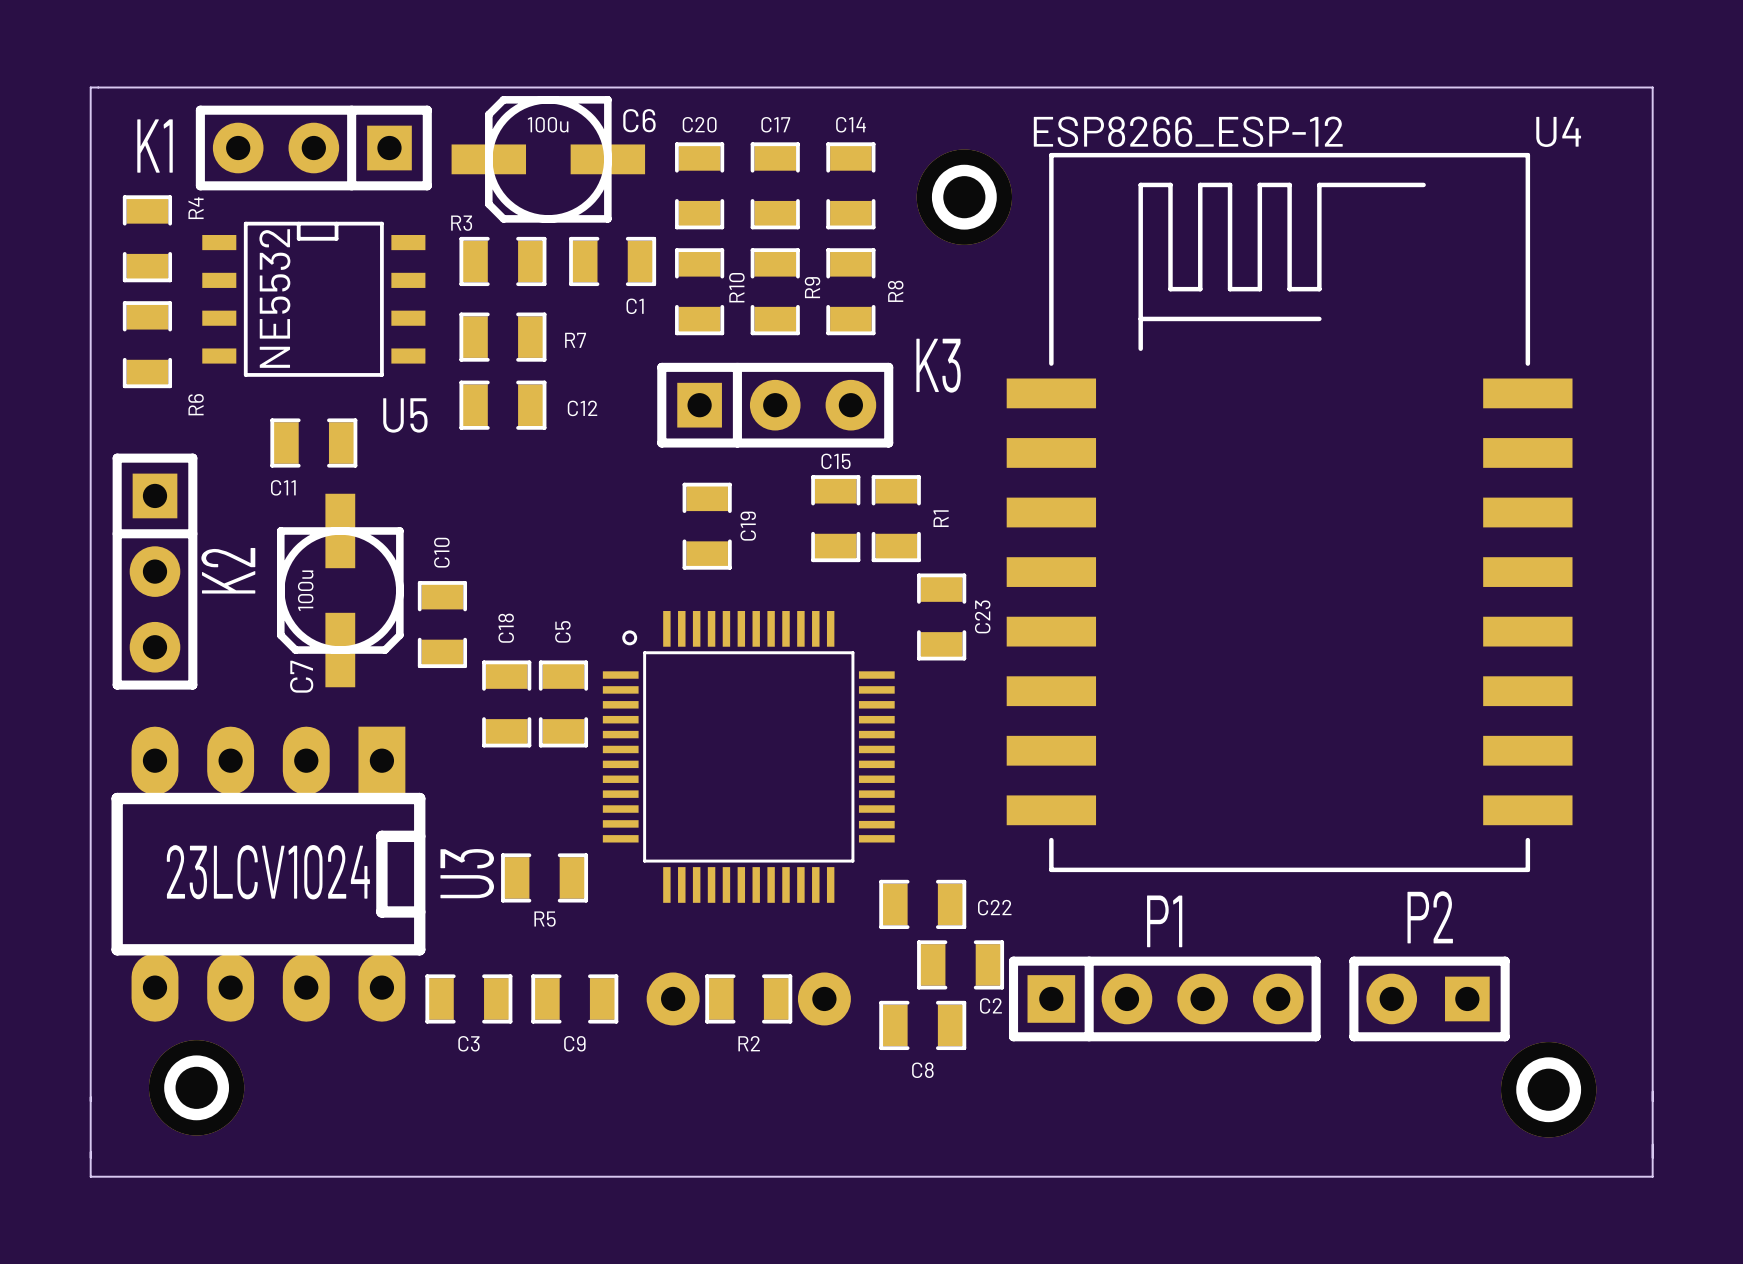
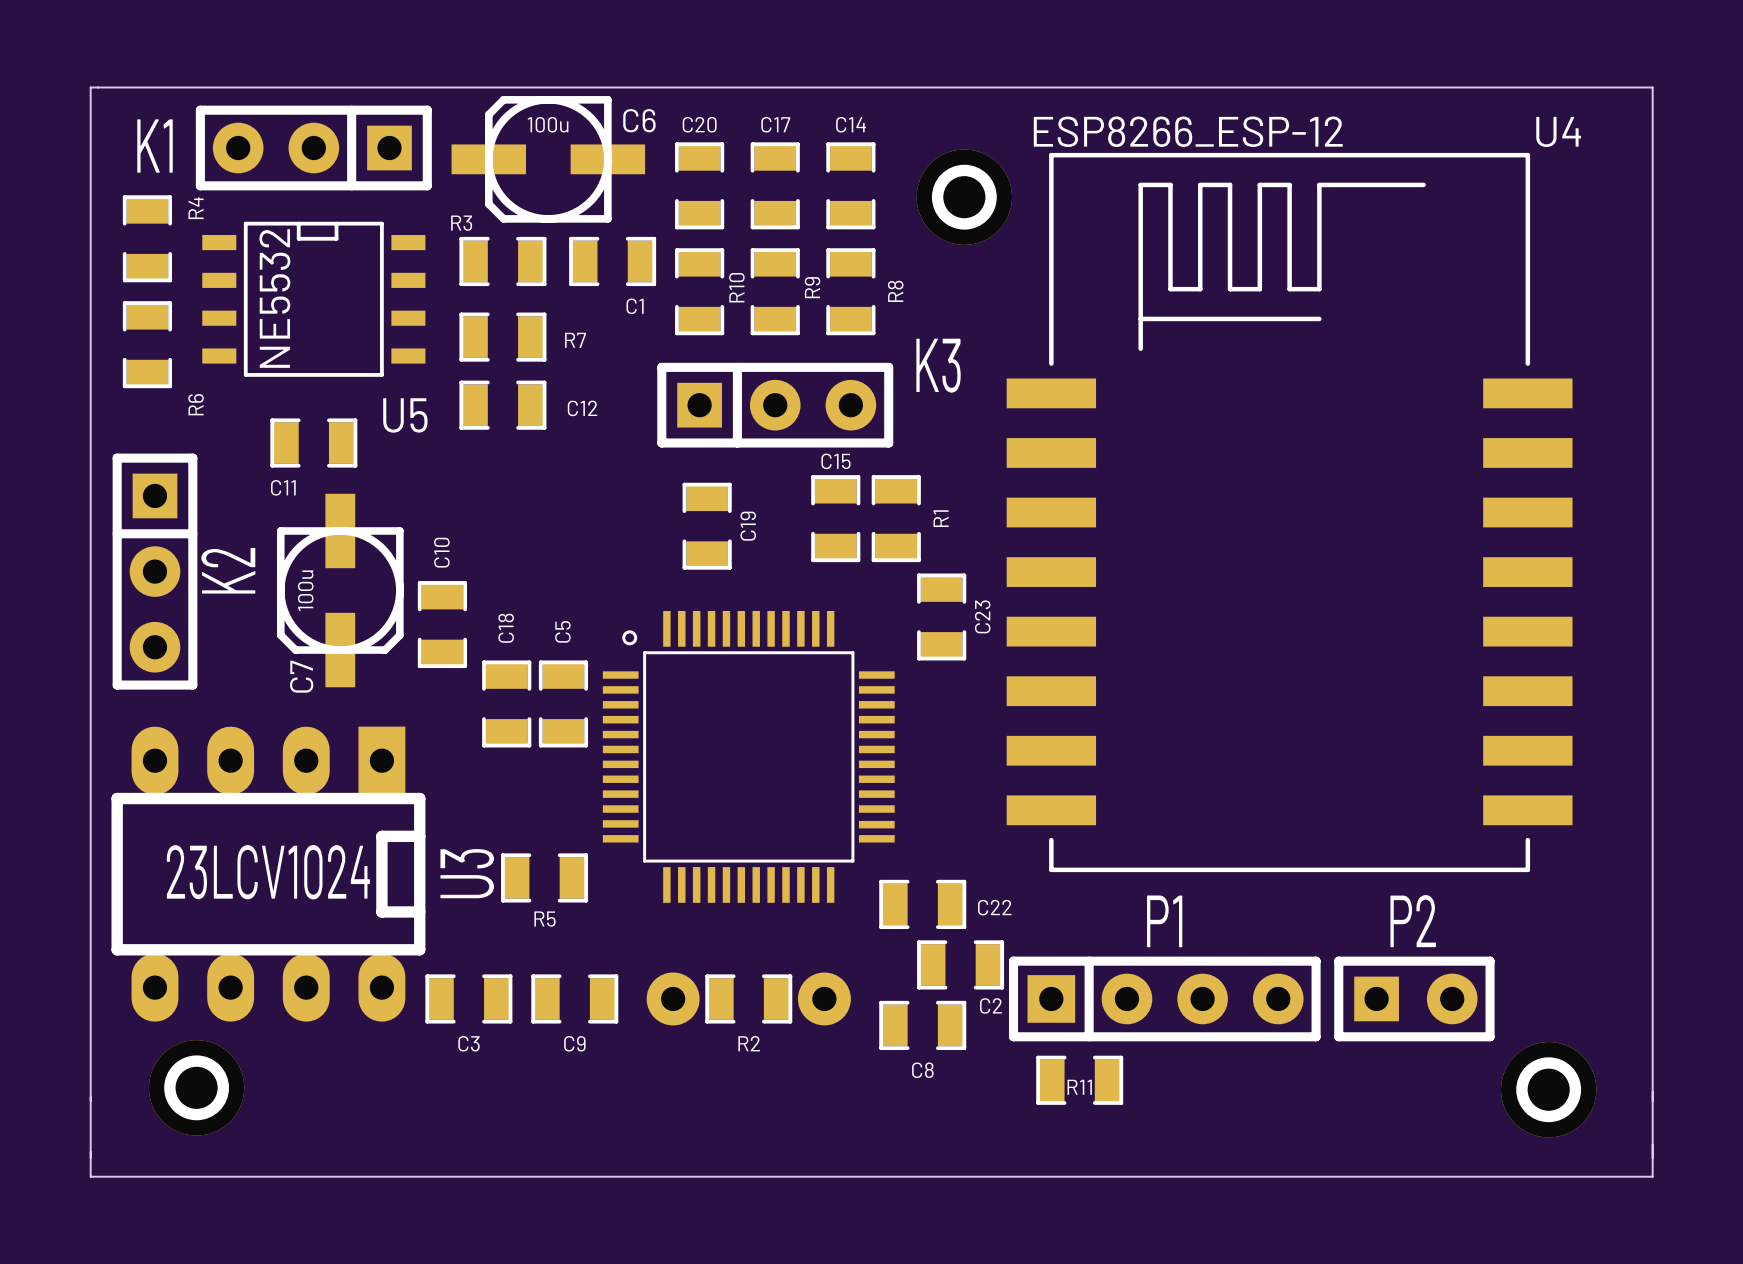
P2 rotation: 0° (1429, 998) -> 180° (1414, 998)
R11: none -> (1079, 1080)

